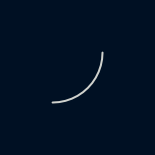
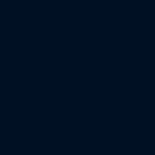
board edge: (102, 52) (98, 71) (87, 87) (71, 98) (52, 102) -> none

